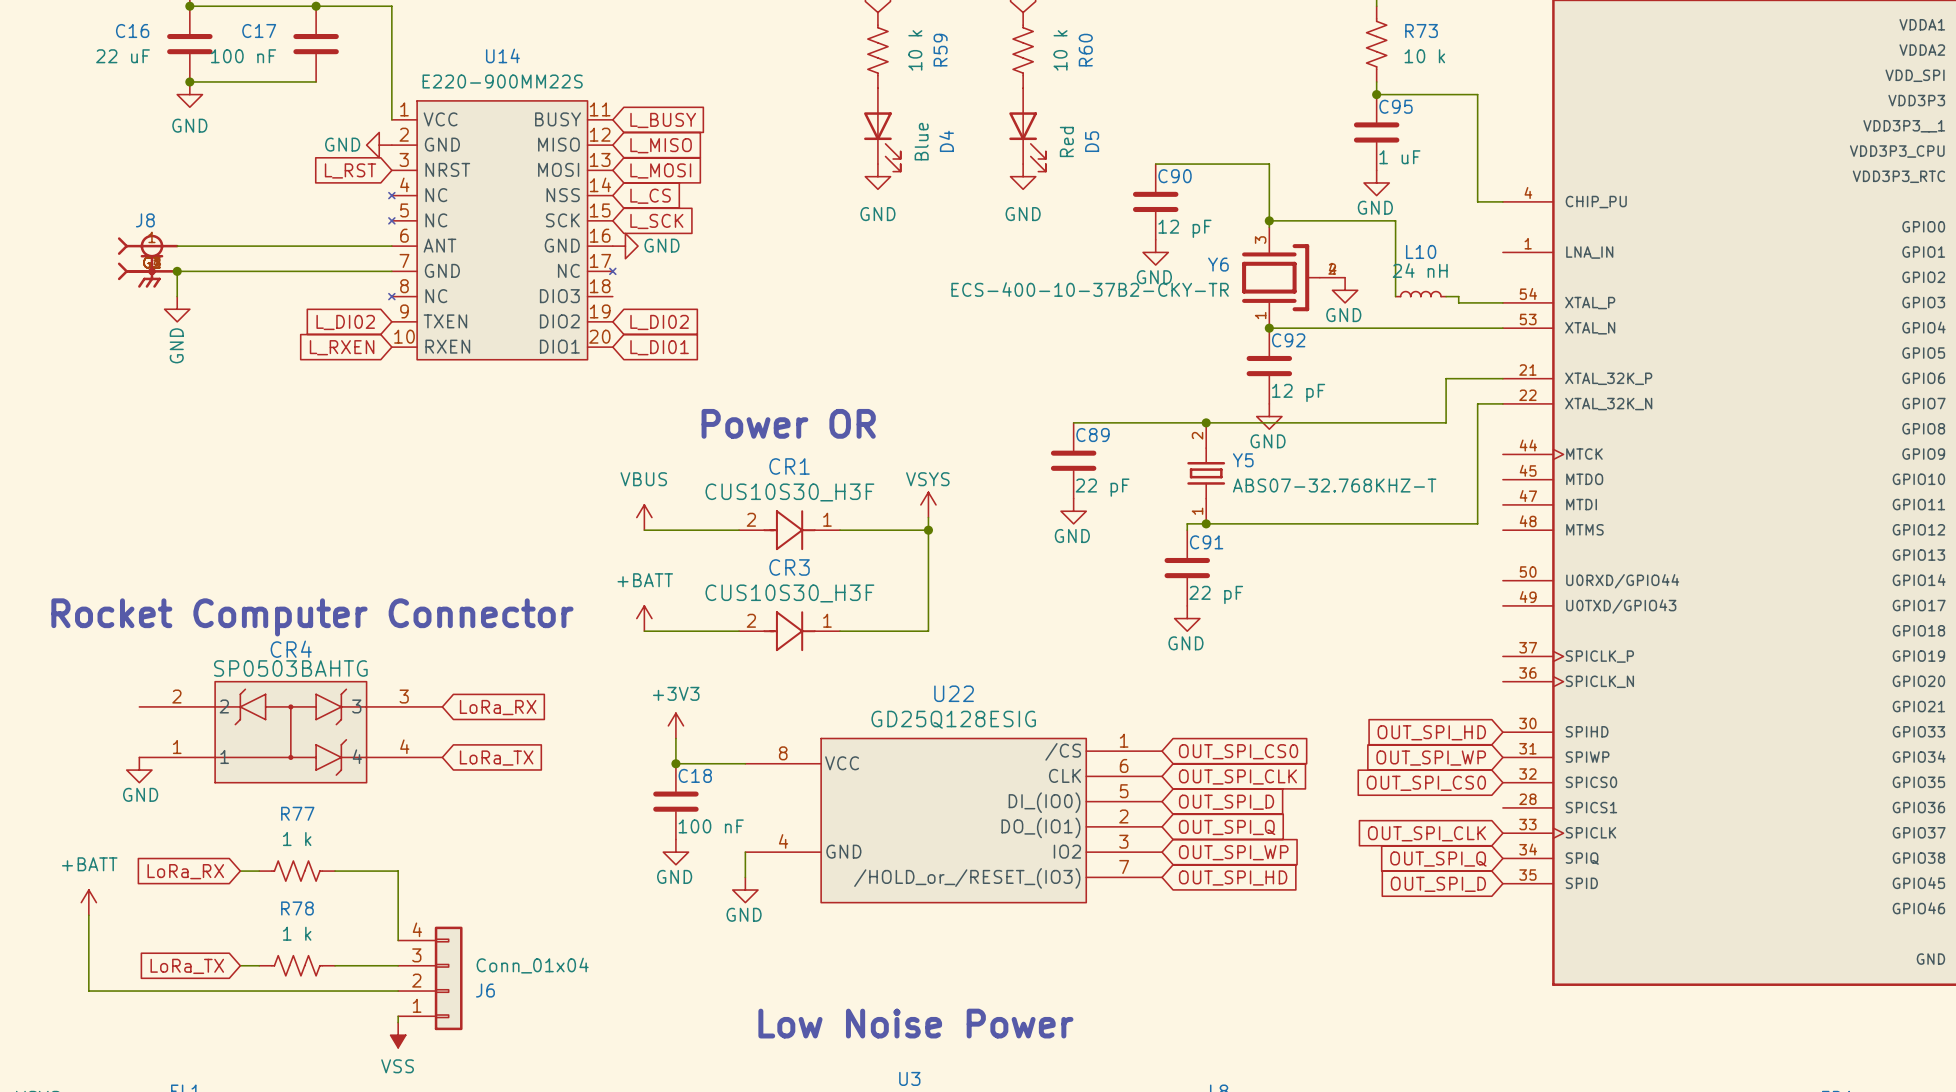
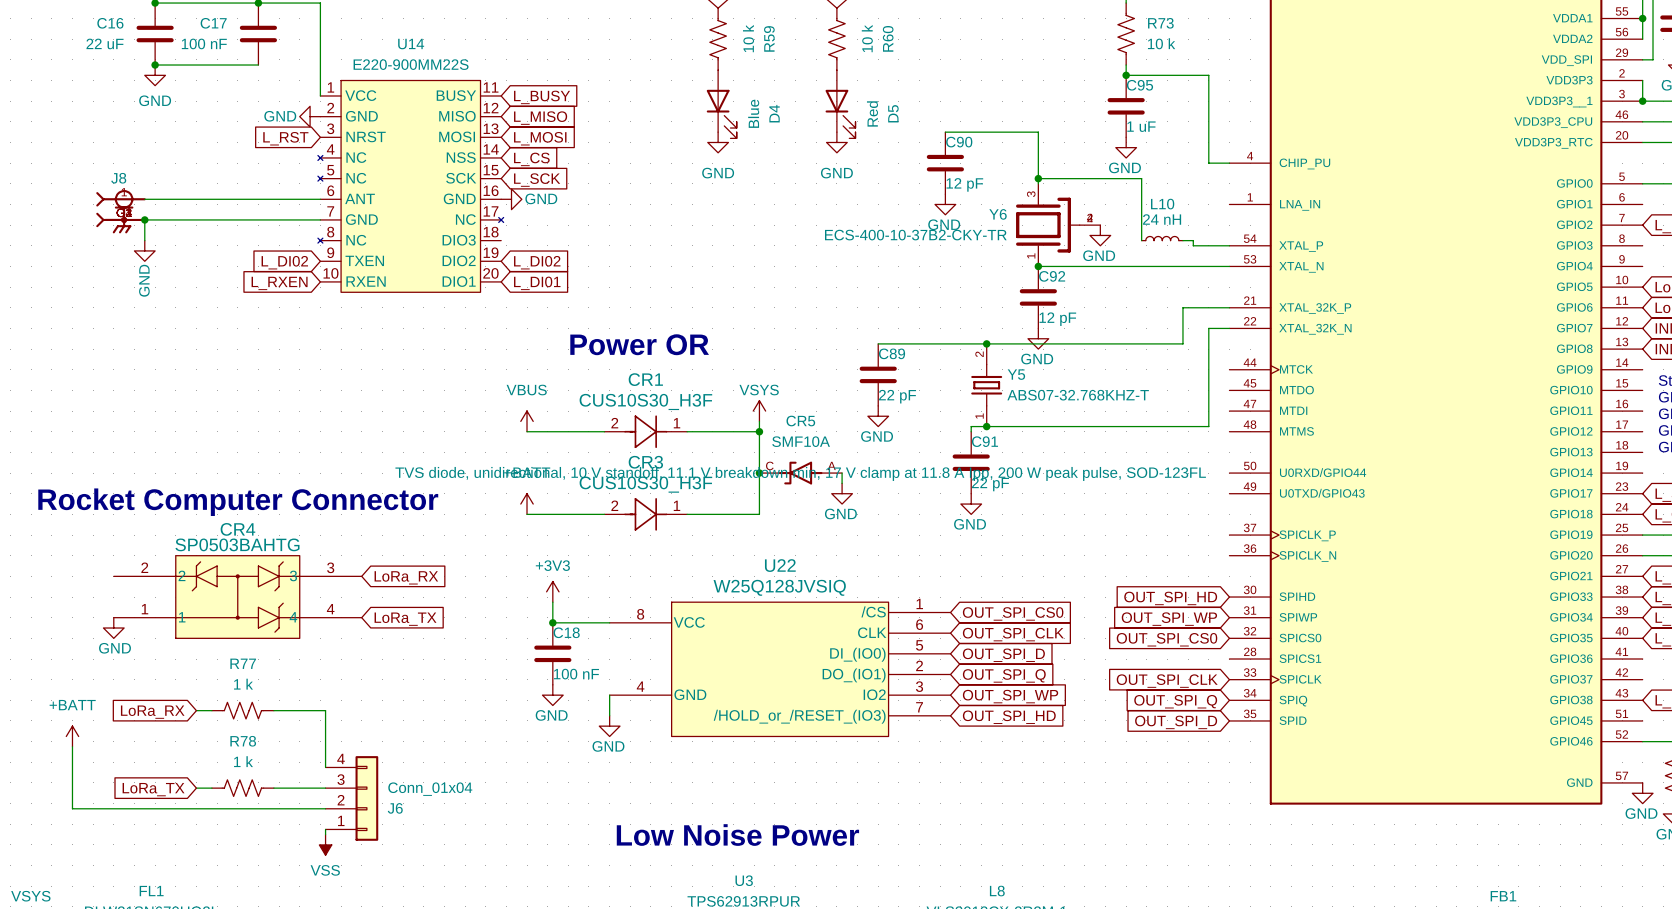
junction: none -> (759, 473)
CR5: none -> SMF10A (800, 473)
wire: none -> (842, 473) (842, 483)
power symbol: none -> GND (842, 493)
U22 value: GD25Q128ESIG (953, 719) -> W25Q128JVSIQ (779, 587)

